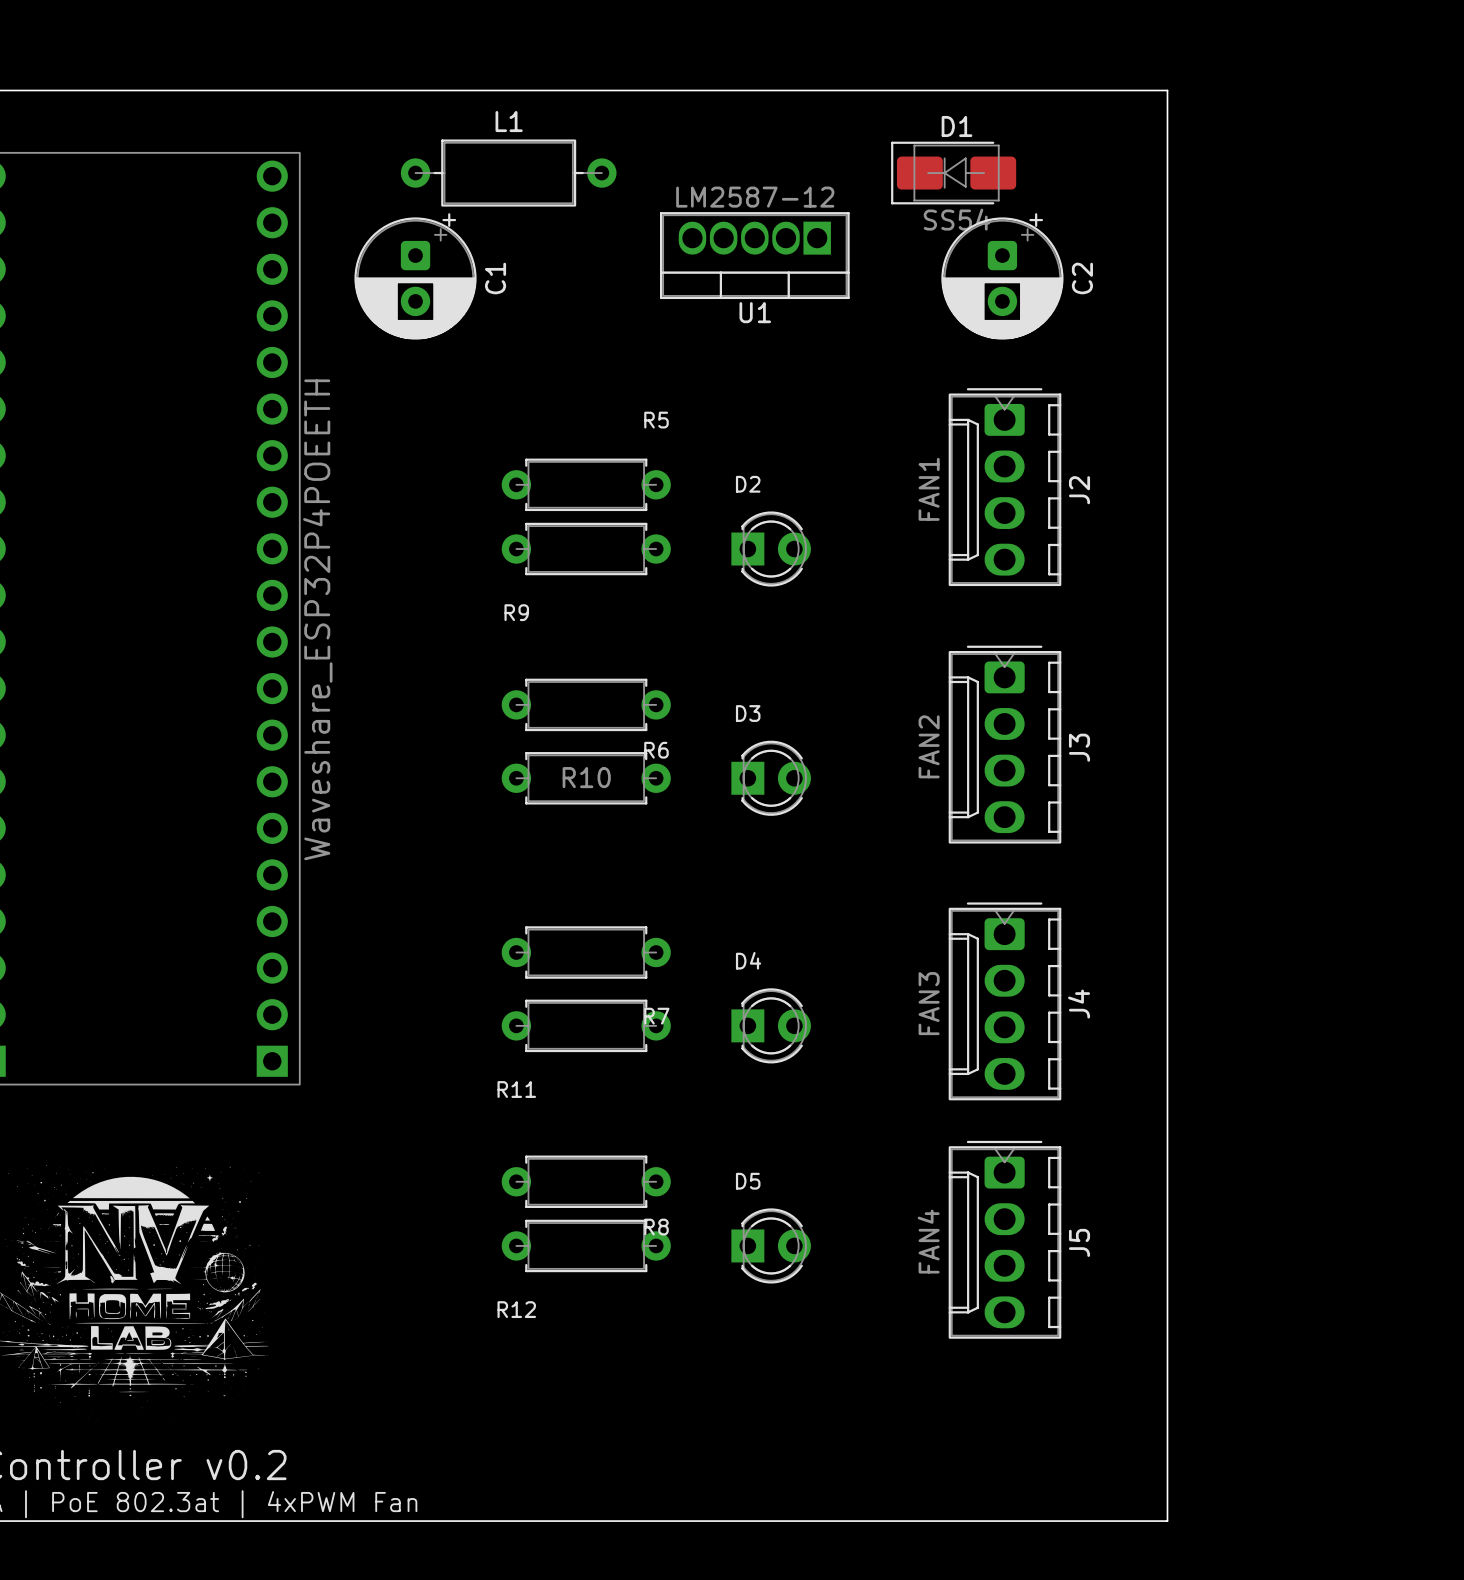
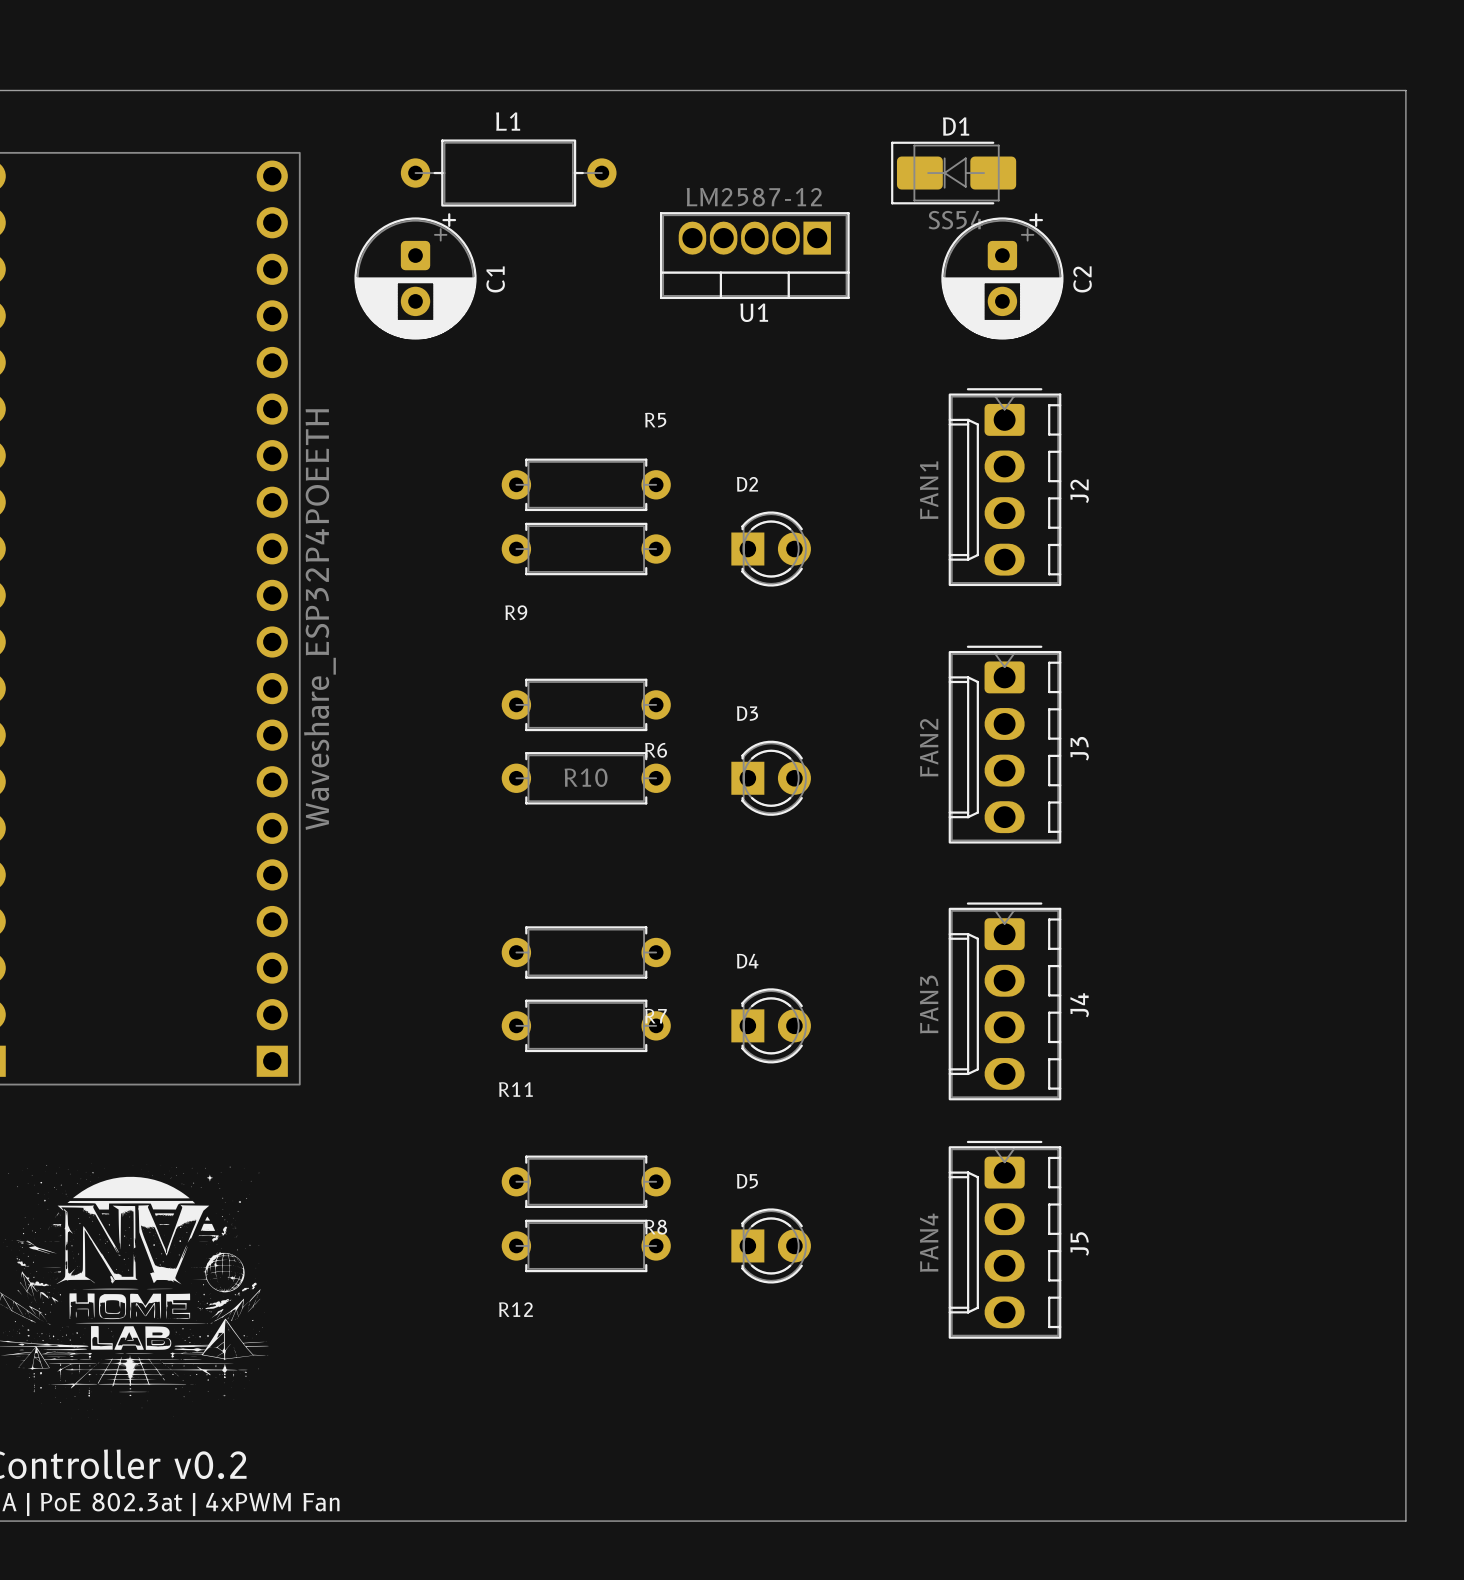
board edge: (1167, 90) (1167, 1521) -> (1167, 90) (1405, 90) (1405, 1521) (1167, 1521)

